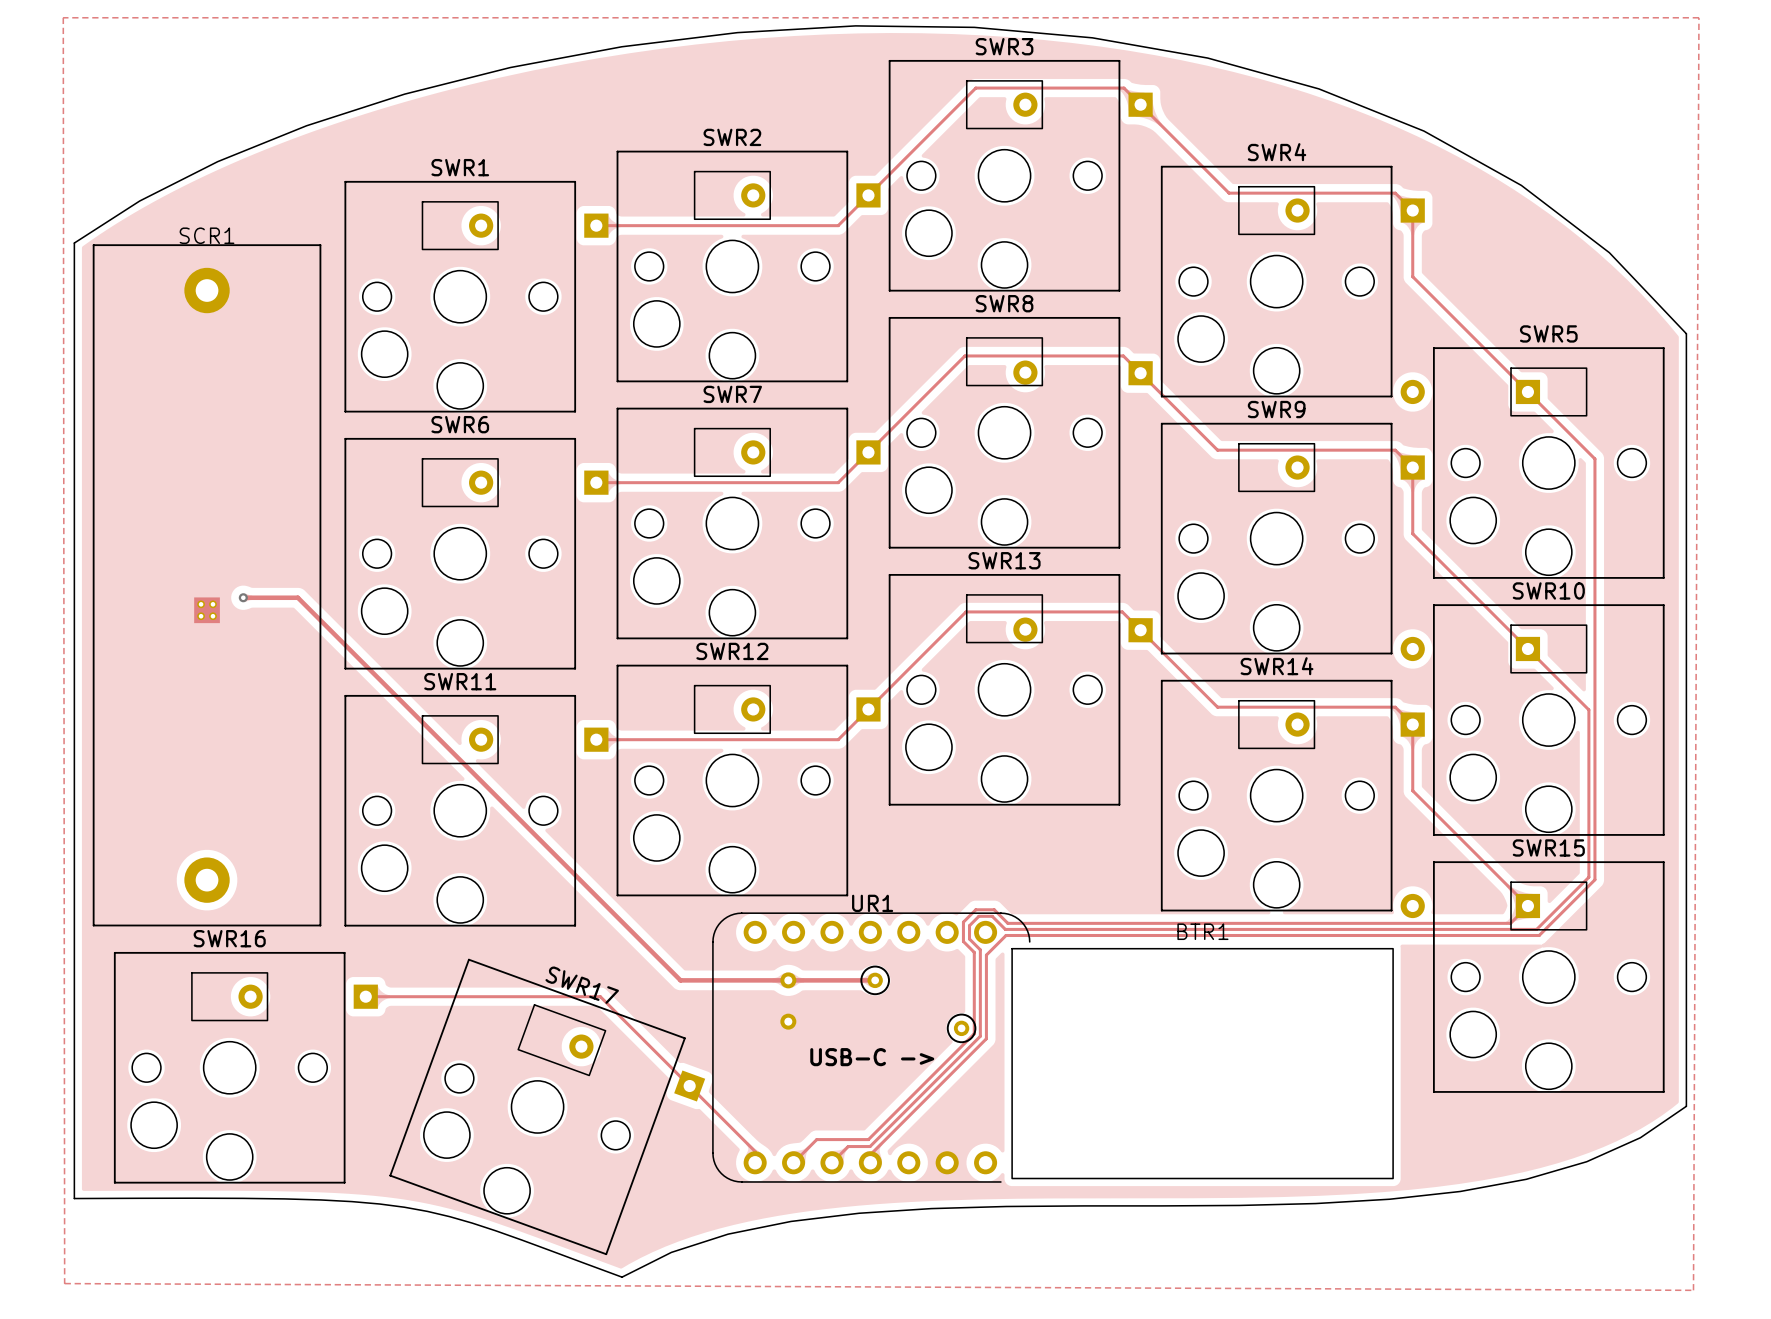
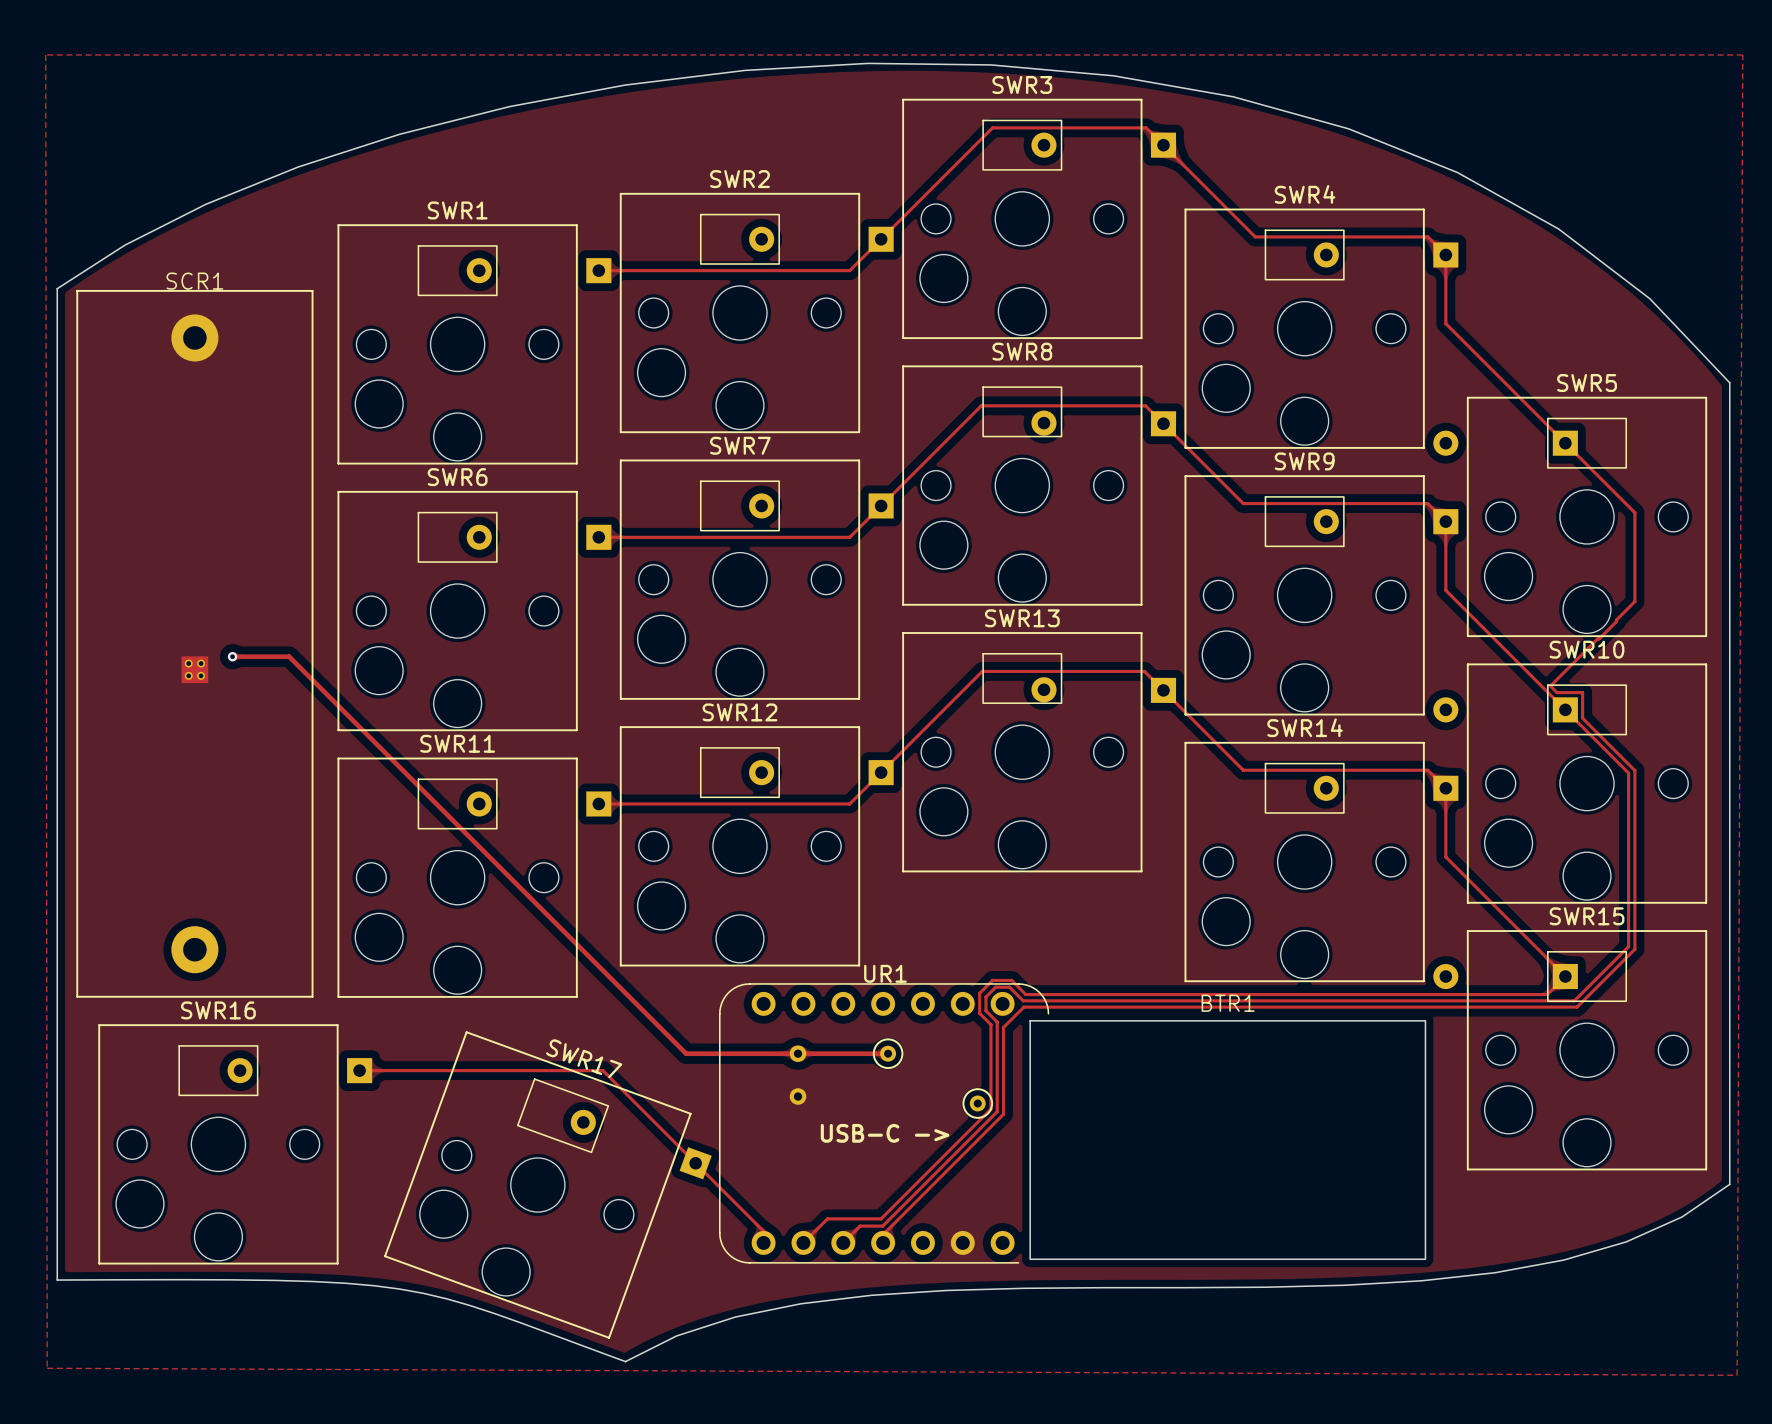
track: (1594, 544) (1594, 707) -> (1634, 601) (1550, 686) (1556, 692) (1582, 692) (1582, 718) (1634, 770)

